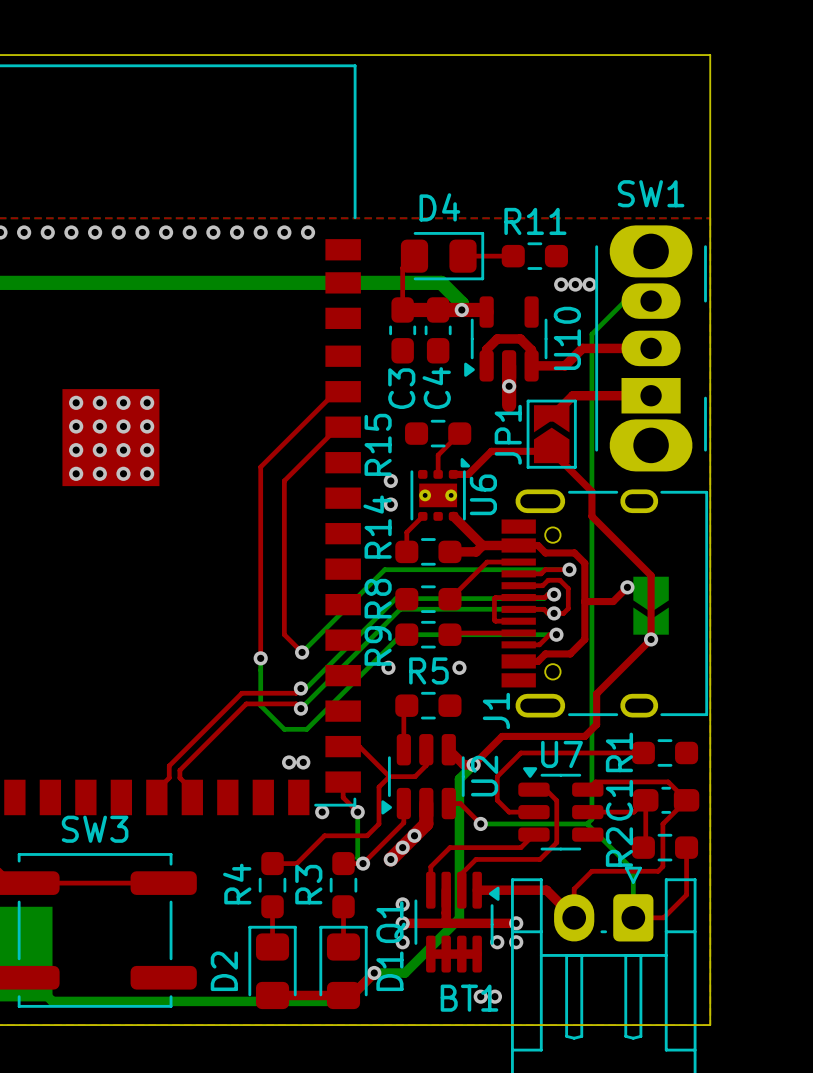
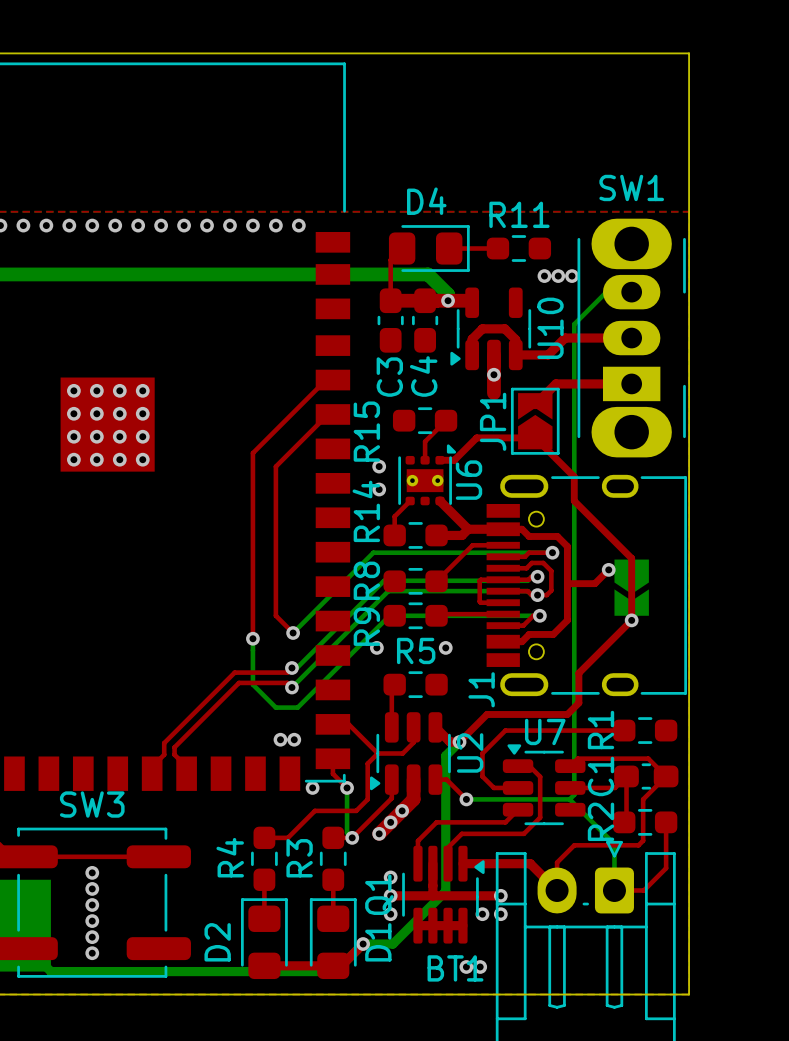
via: none -> (92, 872)
via: none -> (92, 888)
via: none -> (92, 905)
via: none -> (92, 921)
via: none -> (92, 937)
via: none -> (92, 953)

